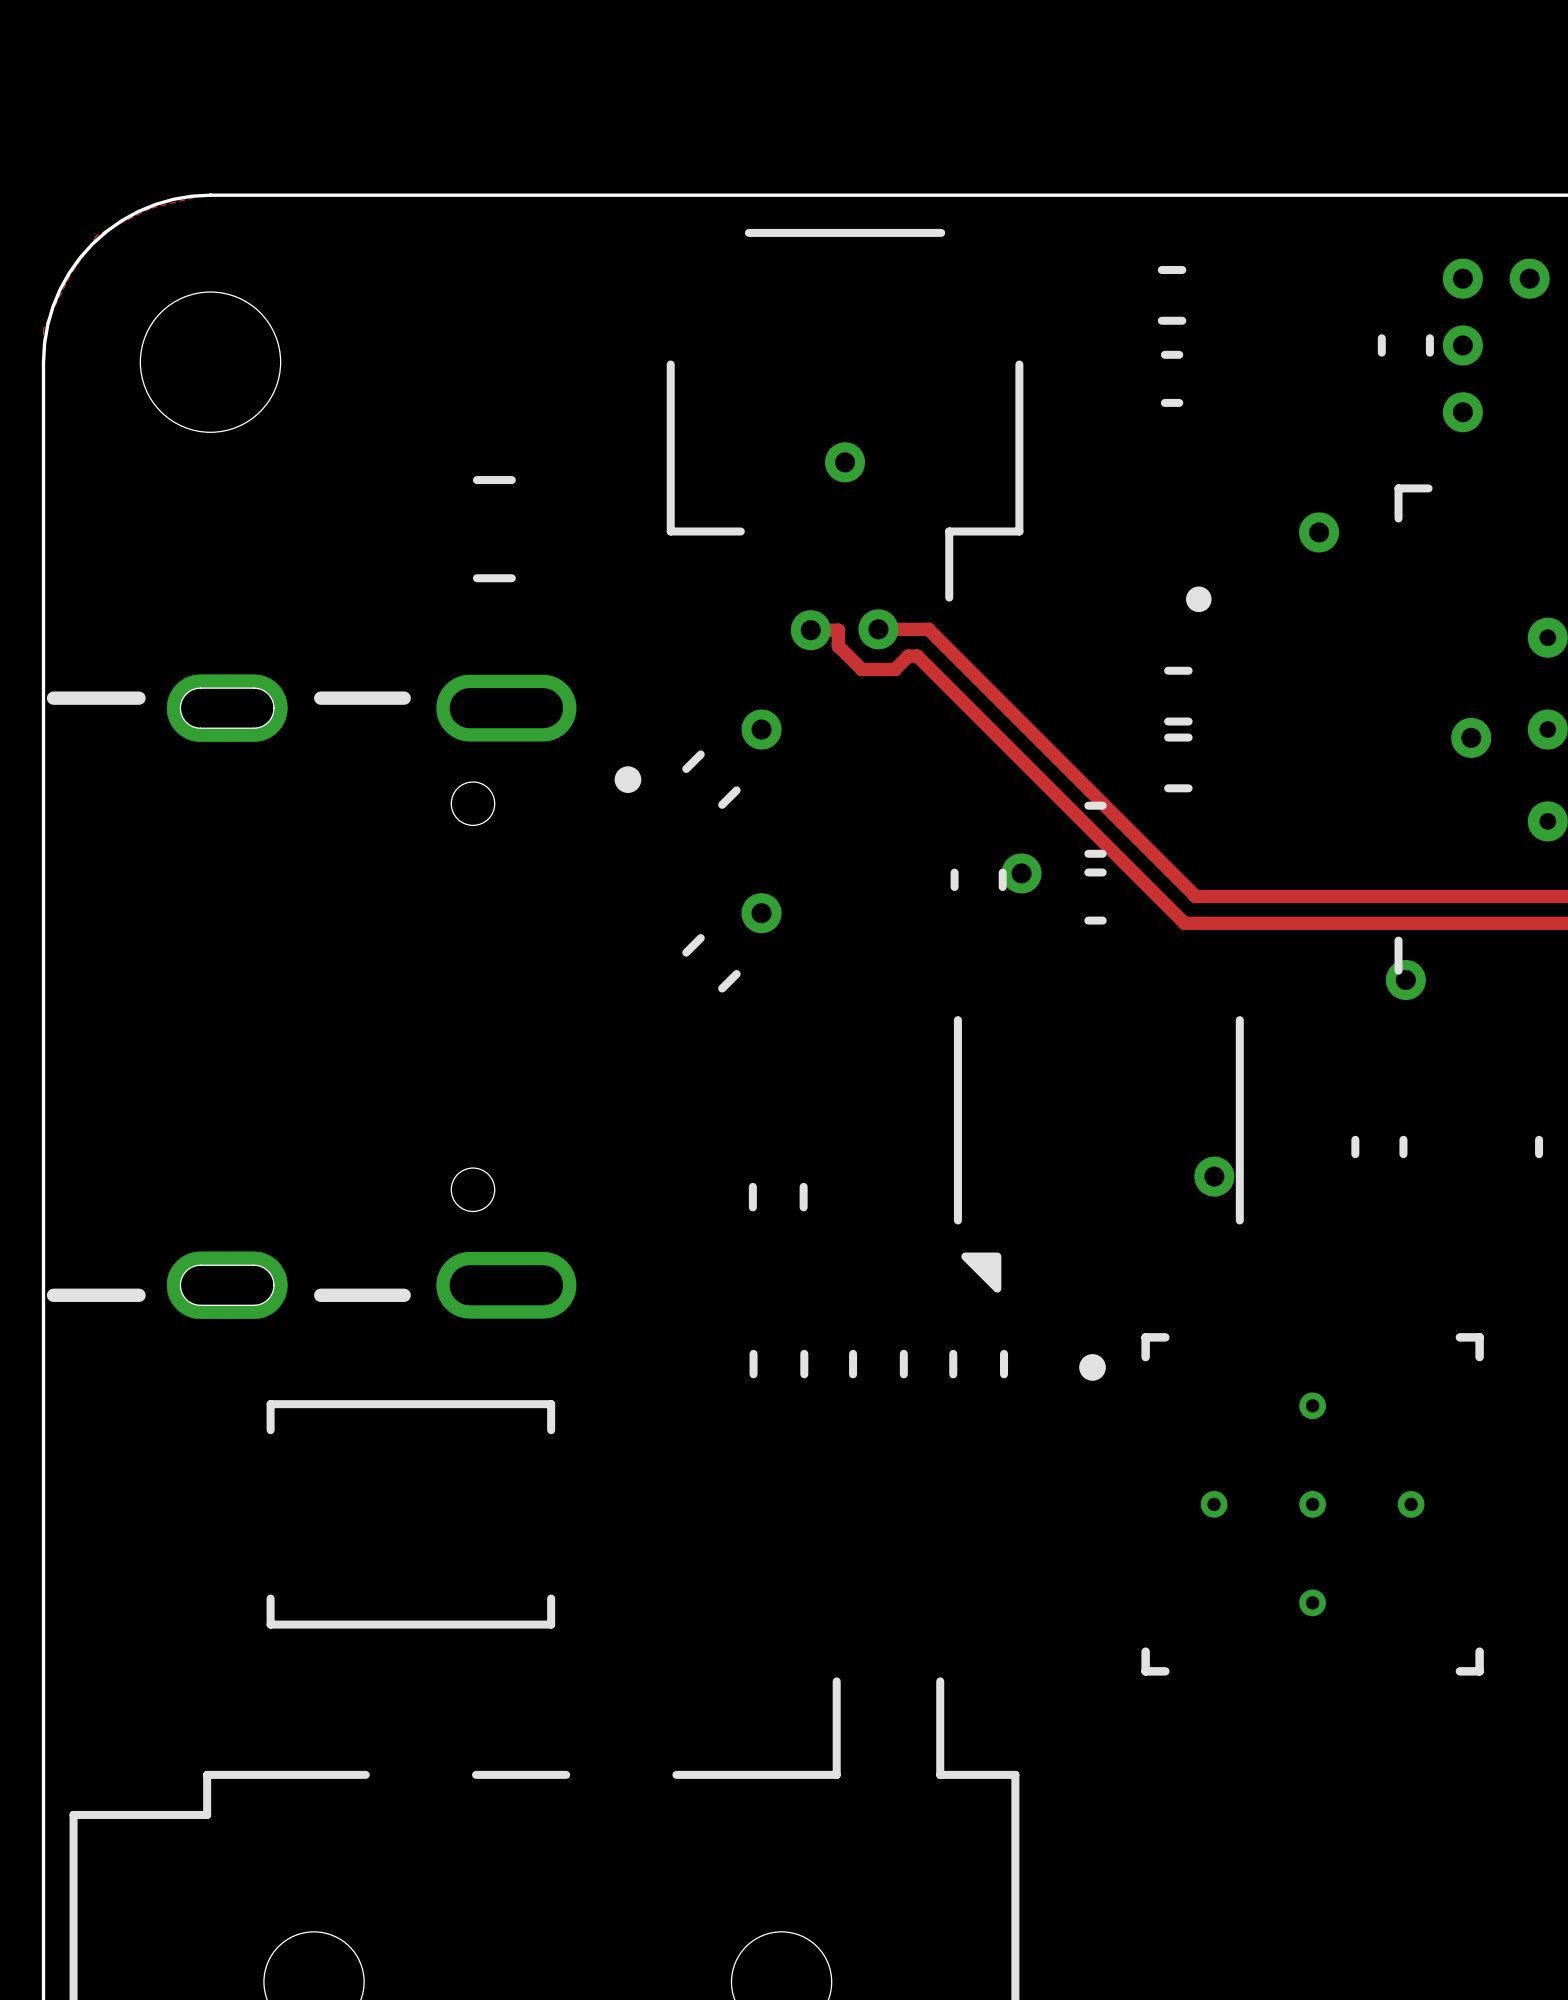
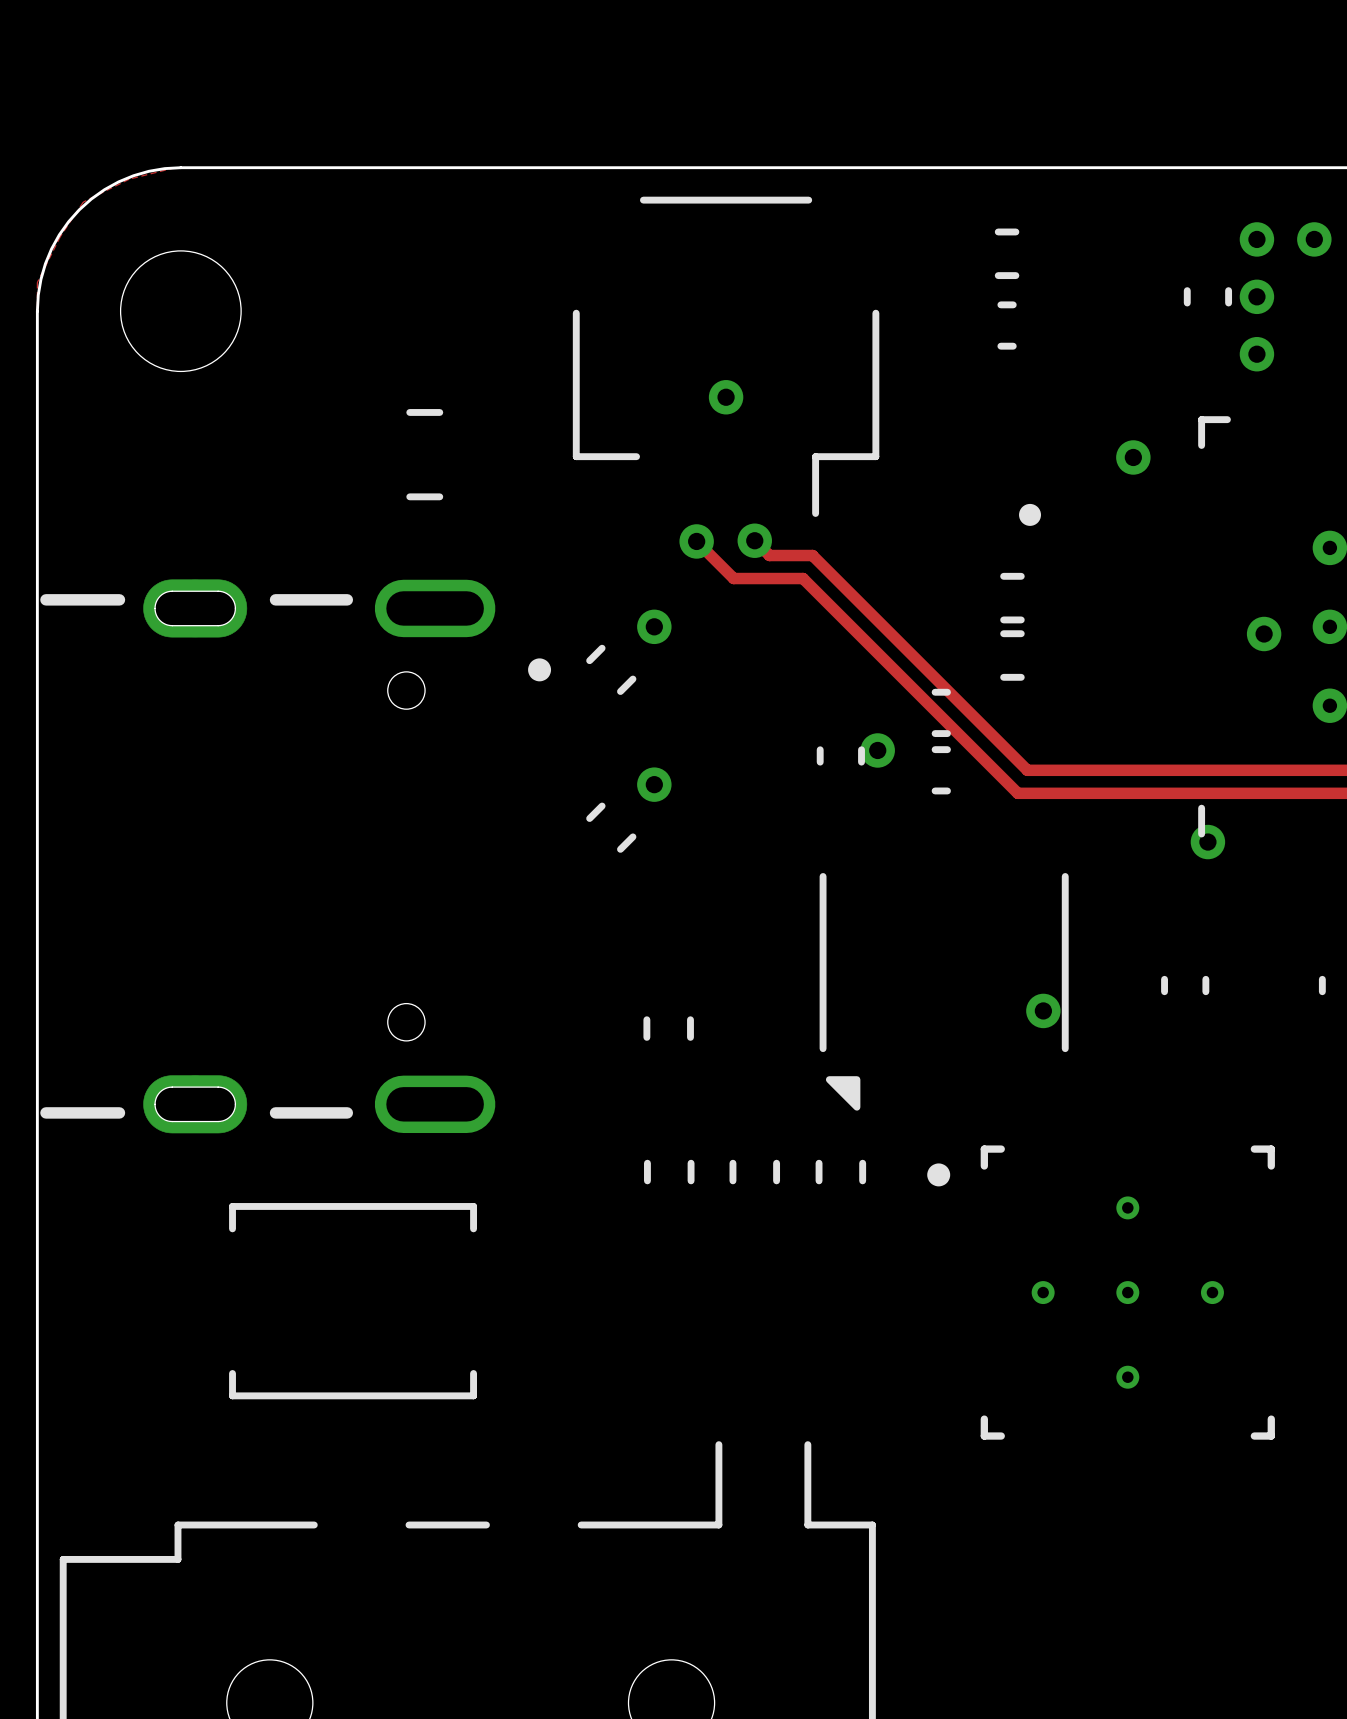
track: (878, 629) (928, 629) (945, 646) -> (754, 540) (769, 555) (812, 555)
track: (810, 630) (838, 630) (838, 645) (861, 669) (895, 669) (908, 656) (917, 656) (934, 673) -> (696, 541) (733, 578) (803, 578)

